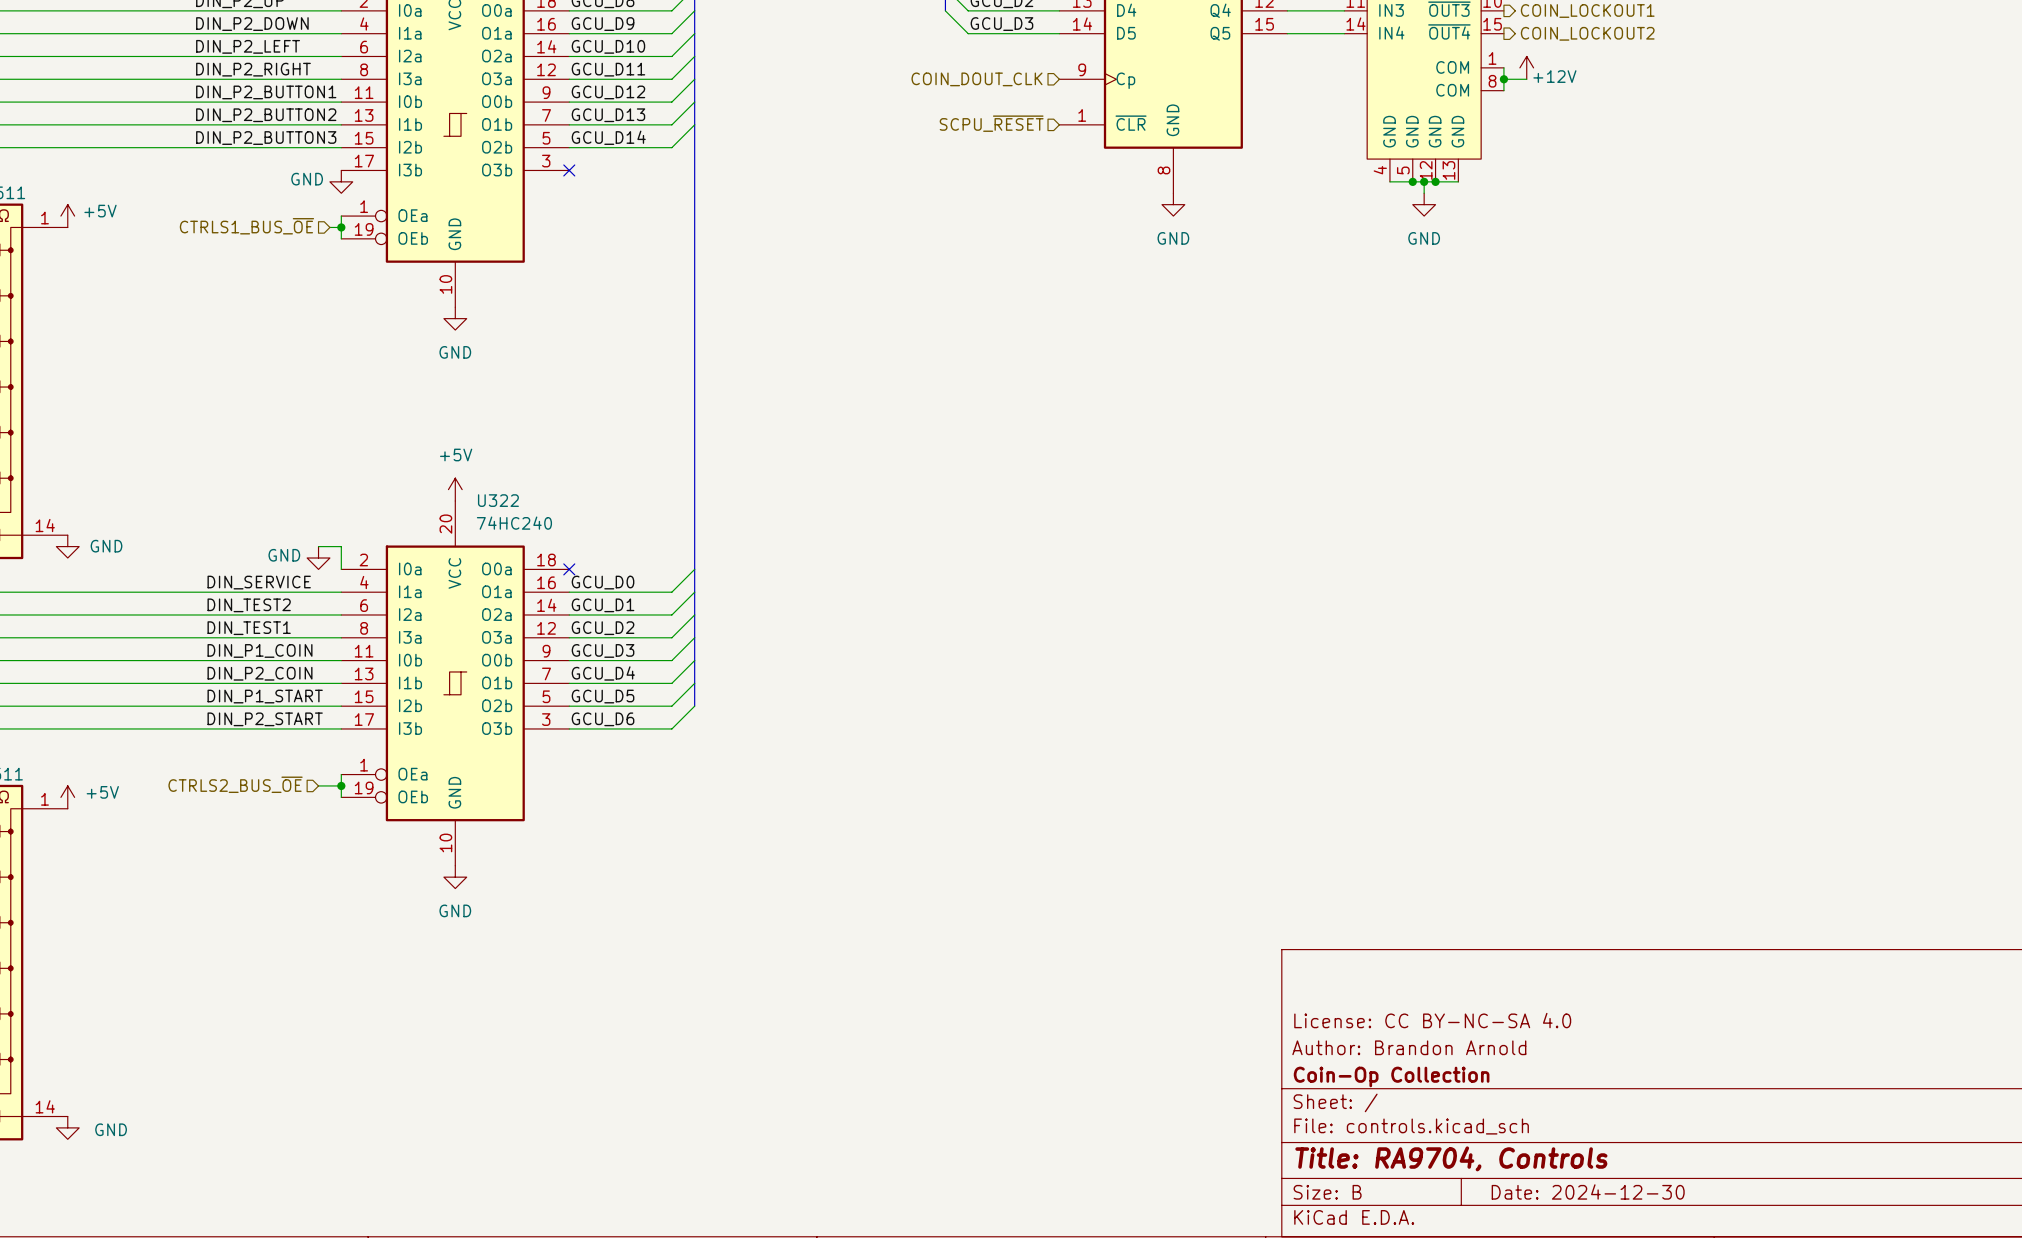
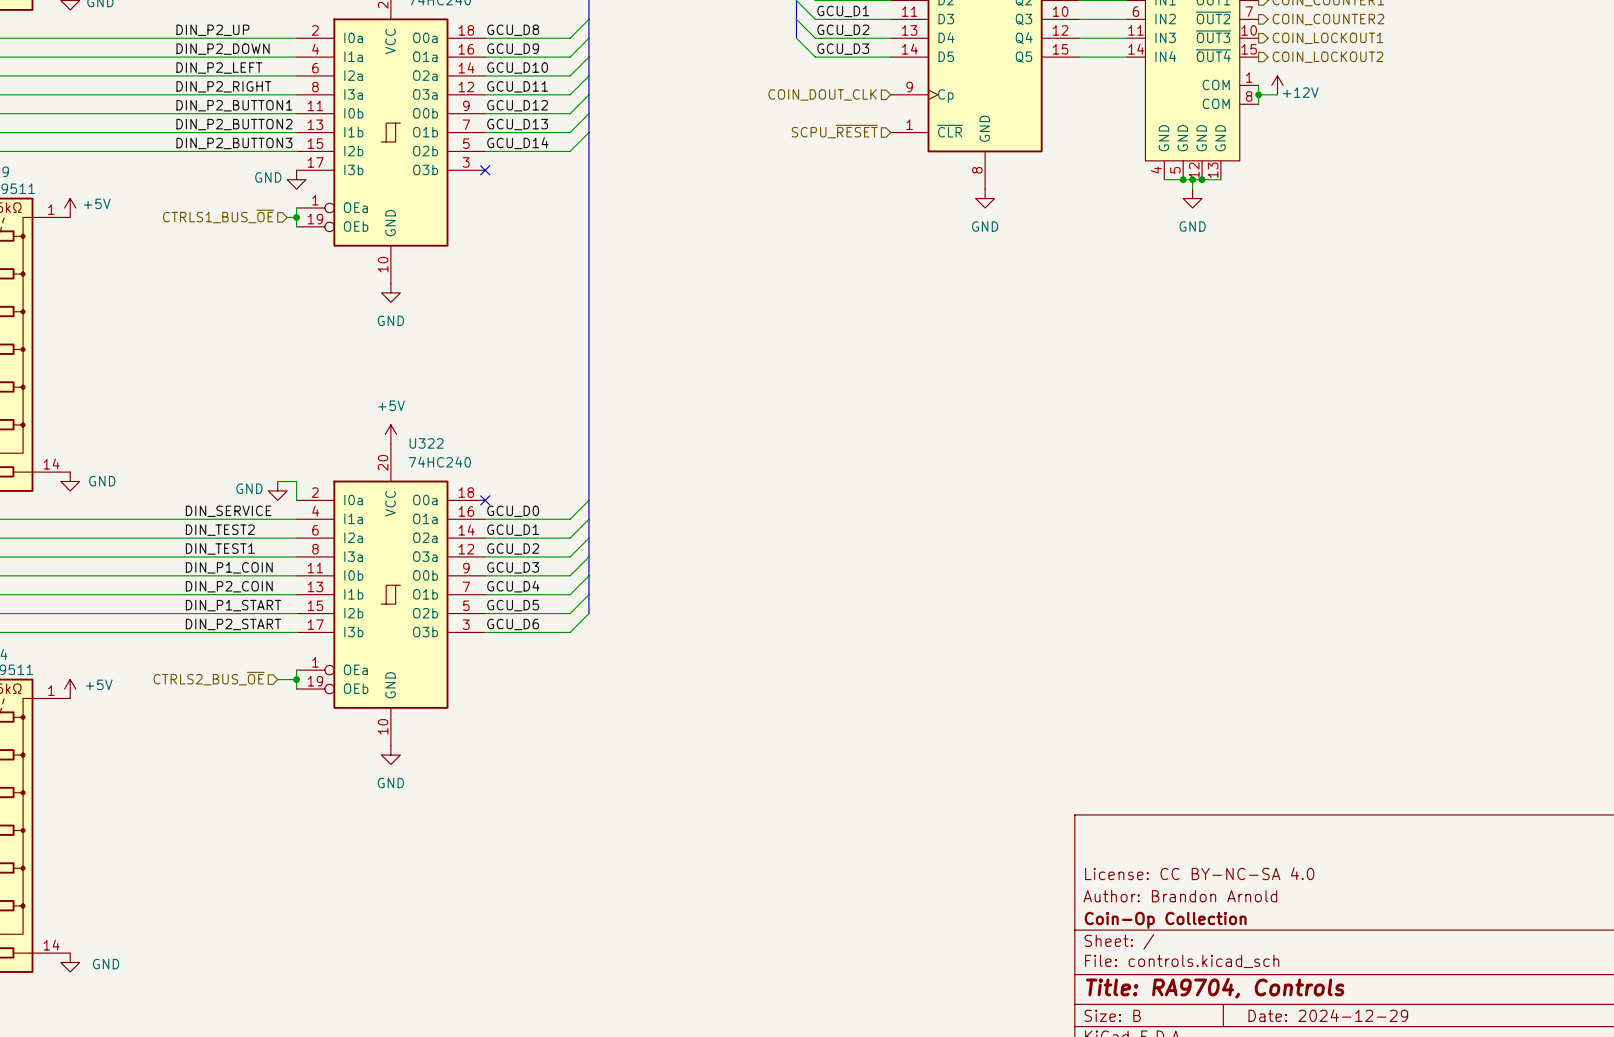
title block: Date: 2024-12-30 (1588, 1191) -> Date: 2024-12-29 (1328, 1015)

